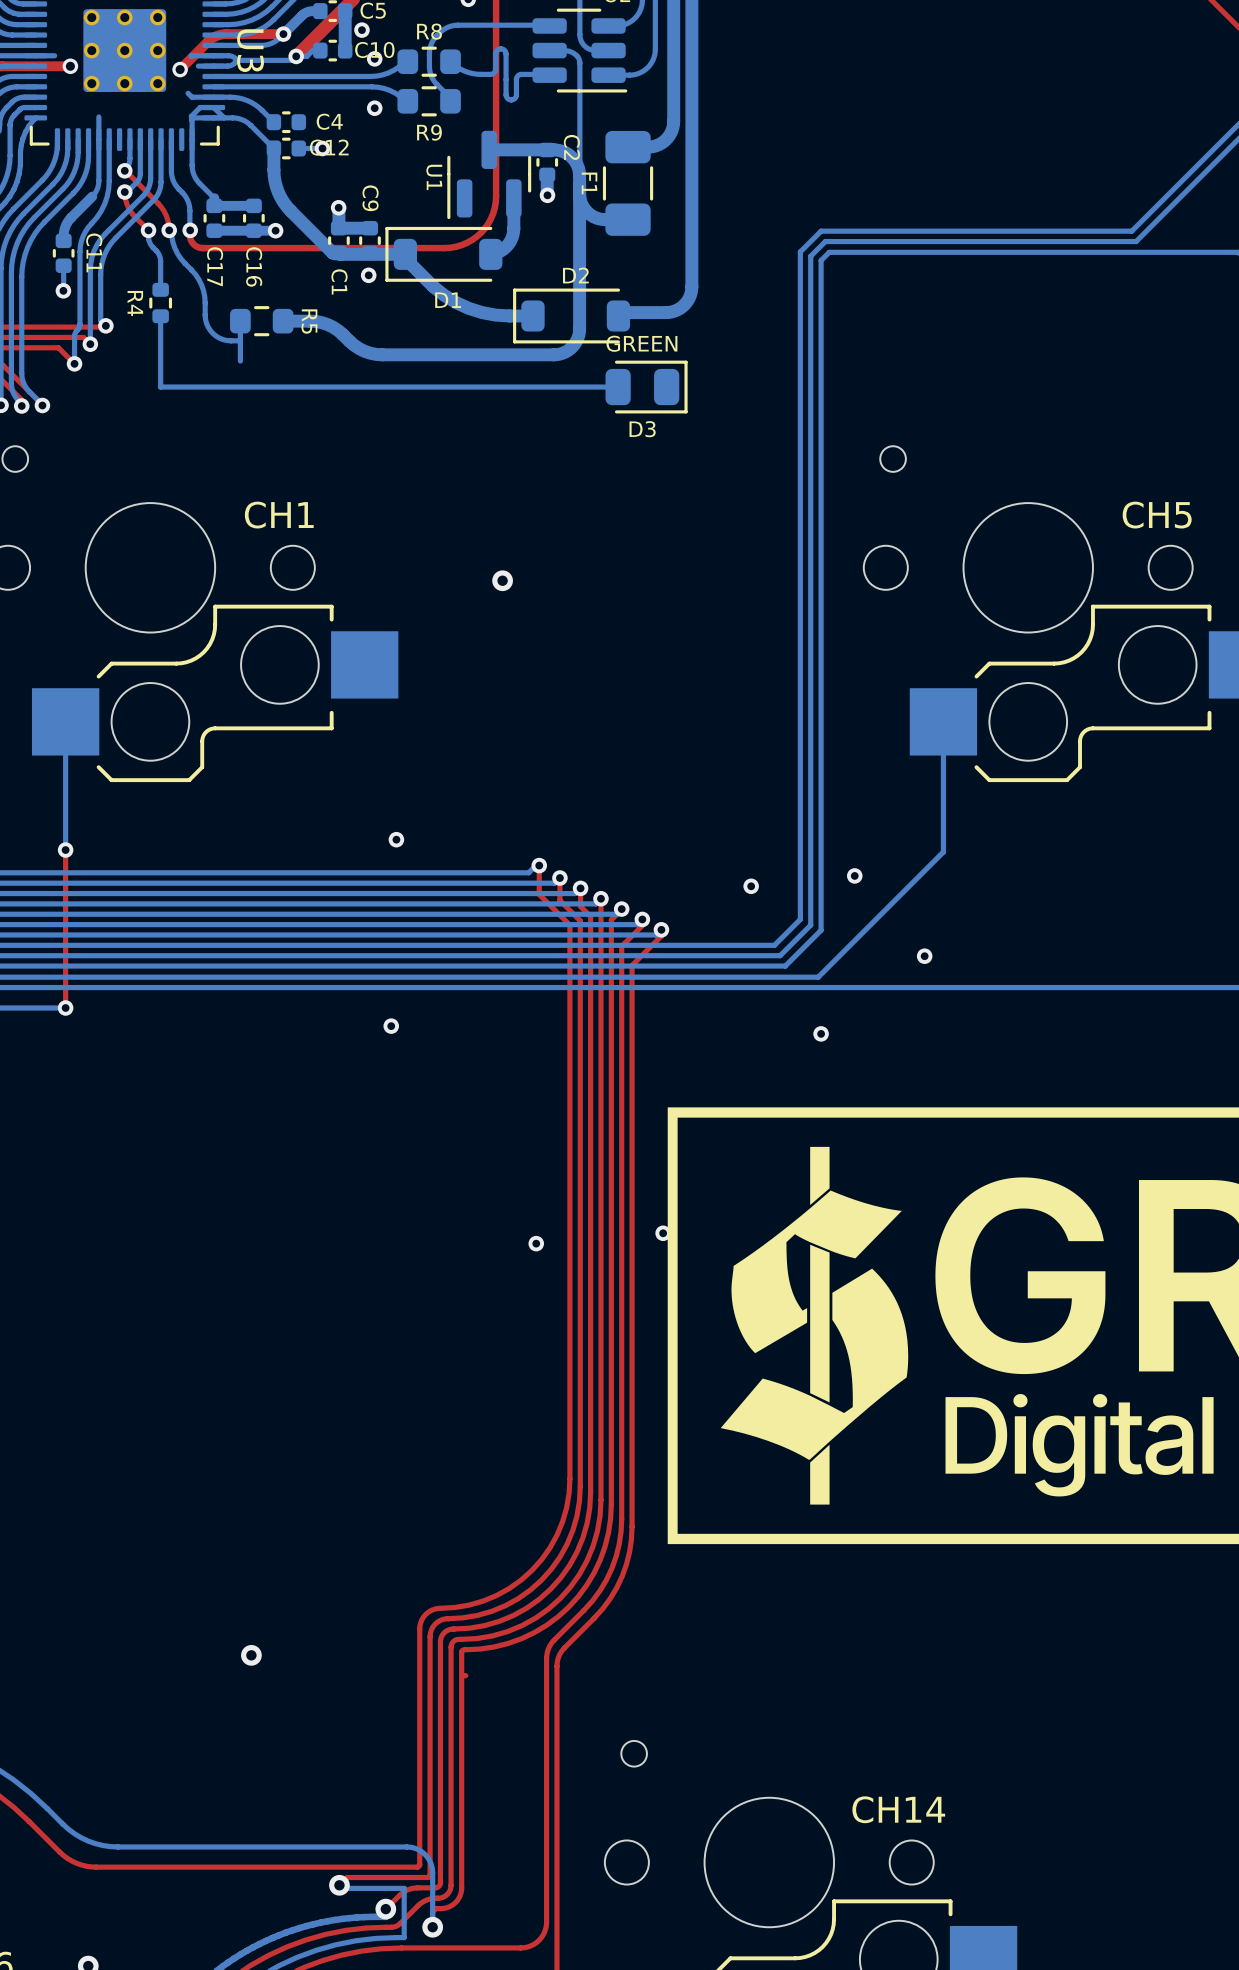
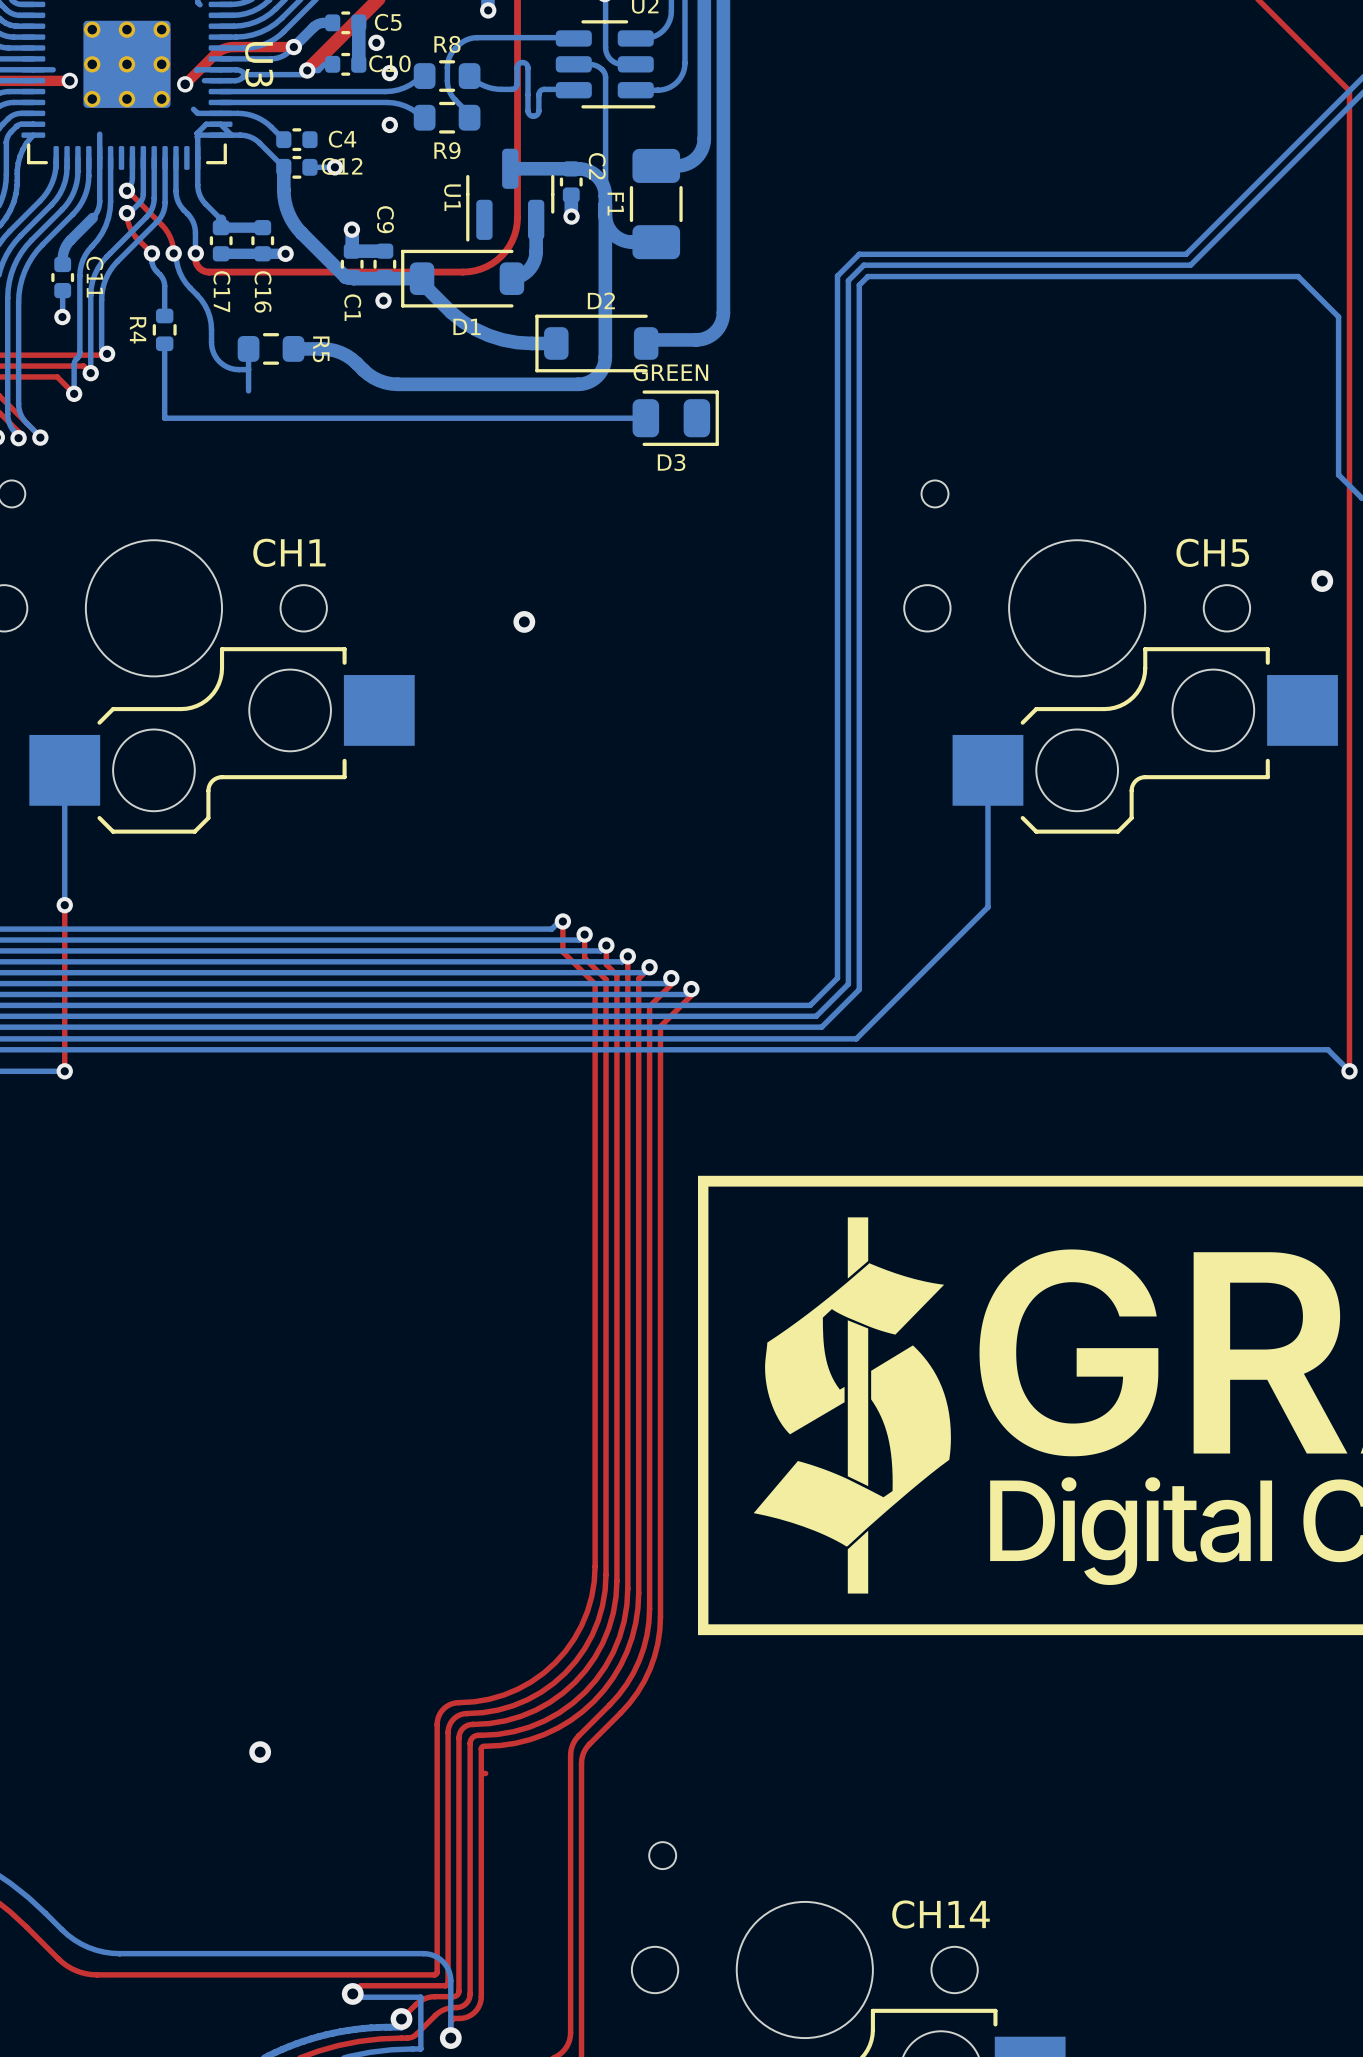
via: (396, 839) -> none
via: (854, 875) -> none
via: (751, 886) -> none
via: (924, 956) -> none
via: (391, 1026) -> none
via: (821, 1033) -> none
via: (663, 1233) -> none
via: (536, 1243) -> none

